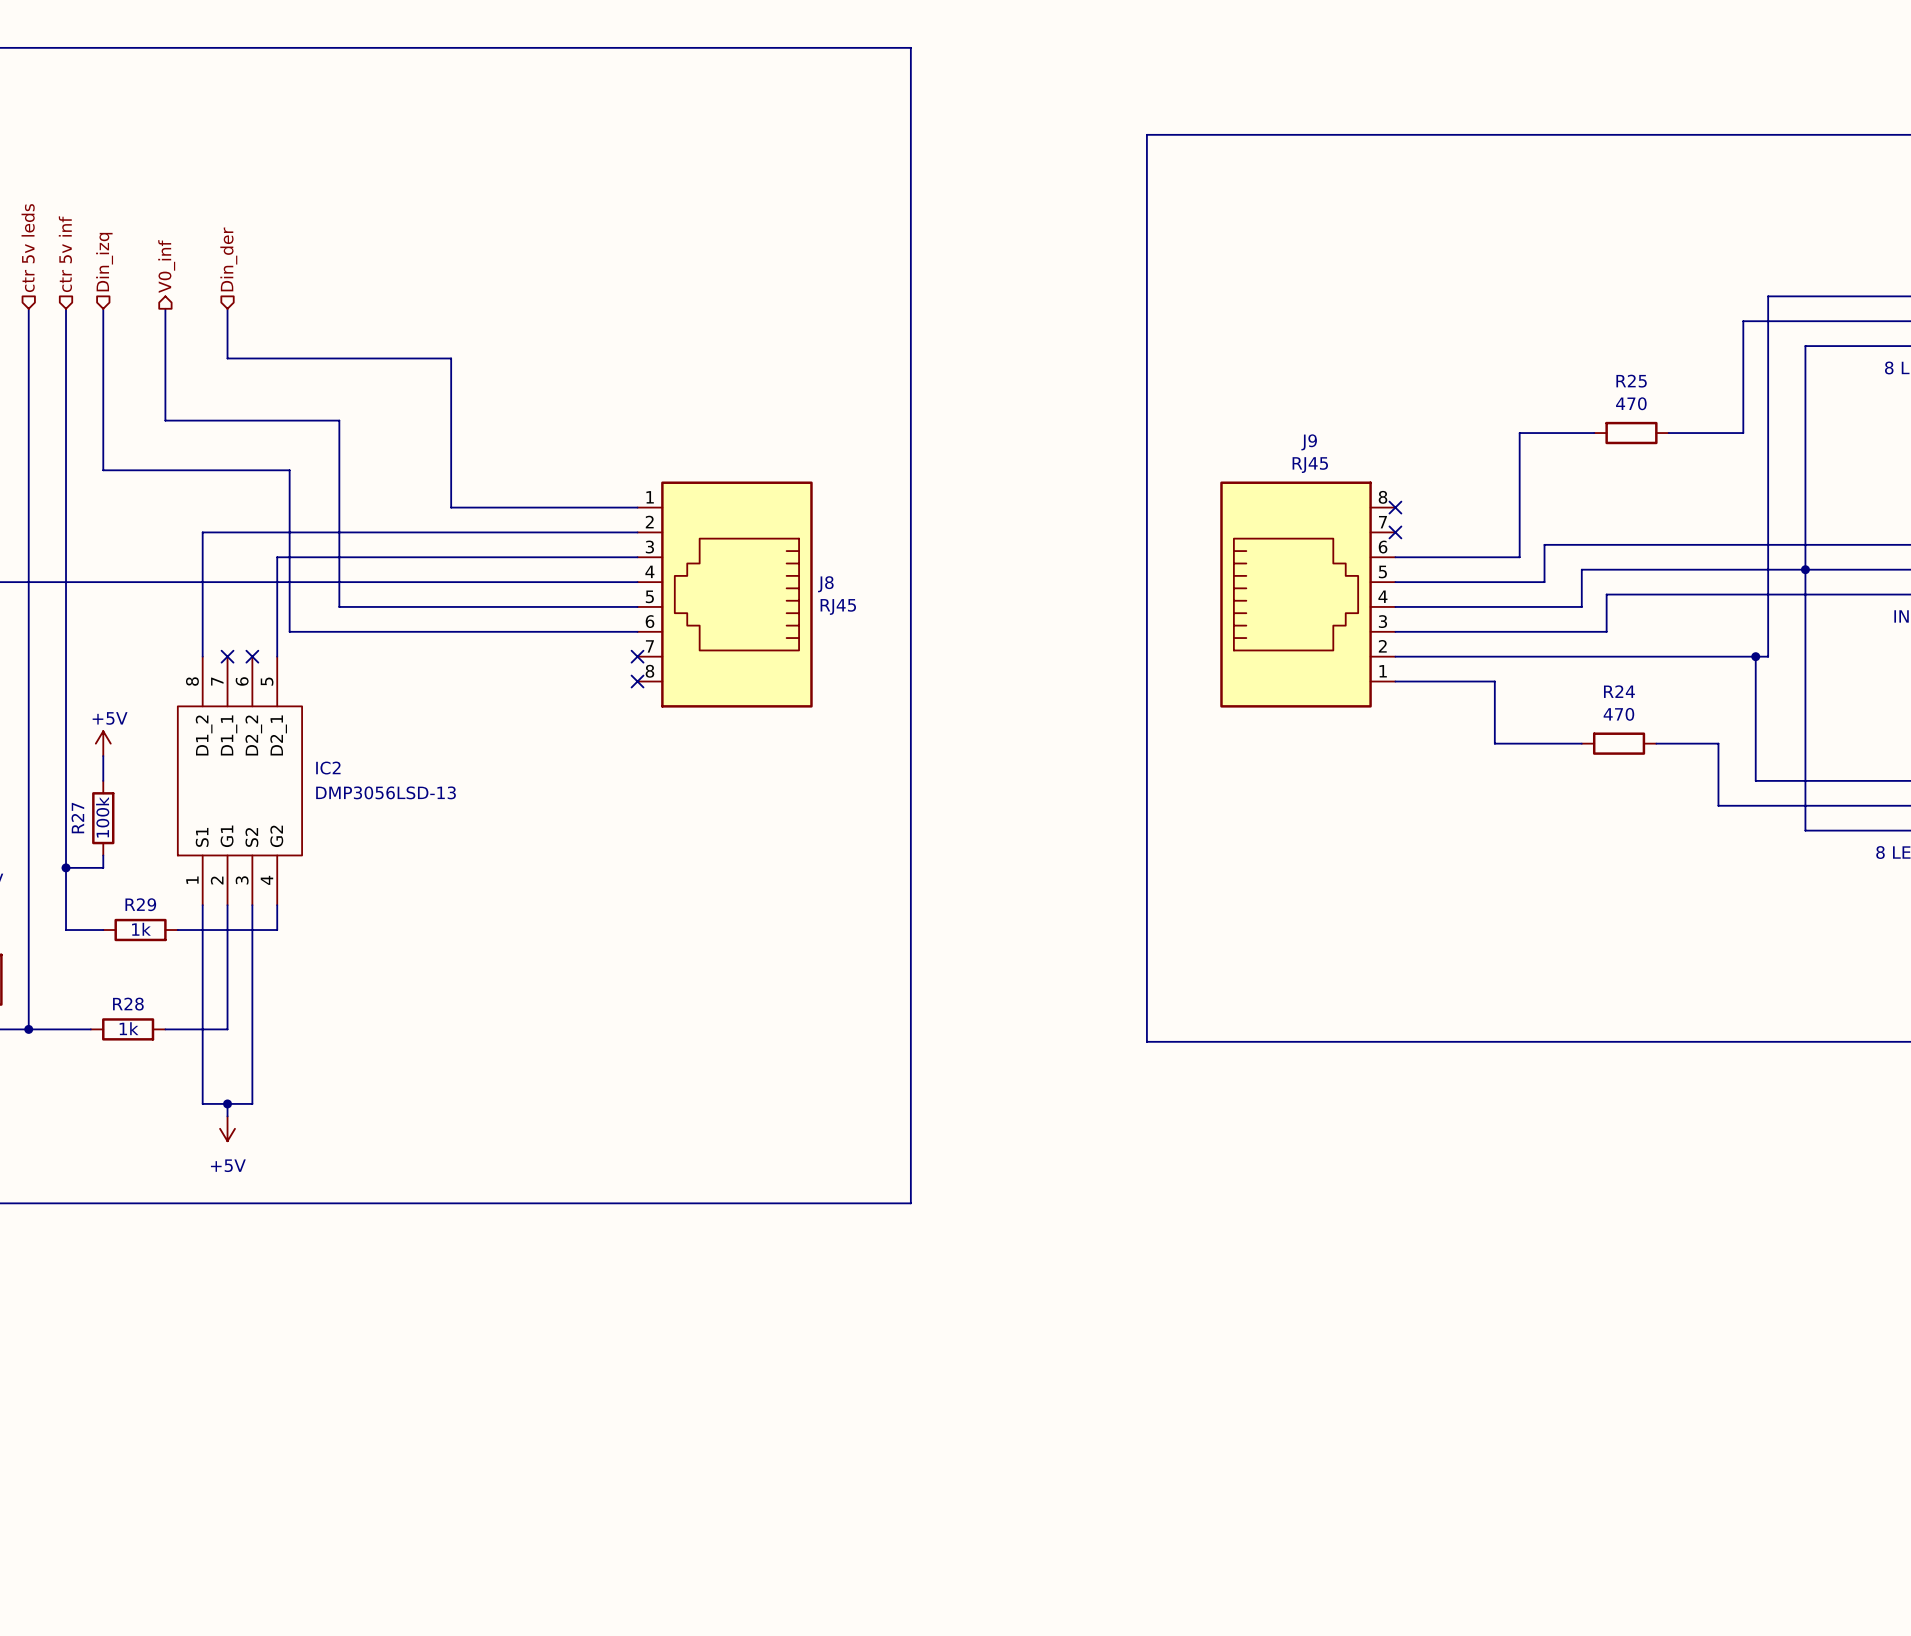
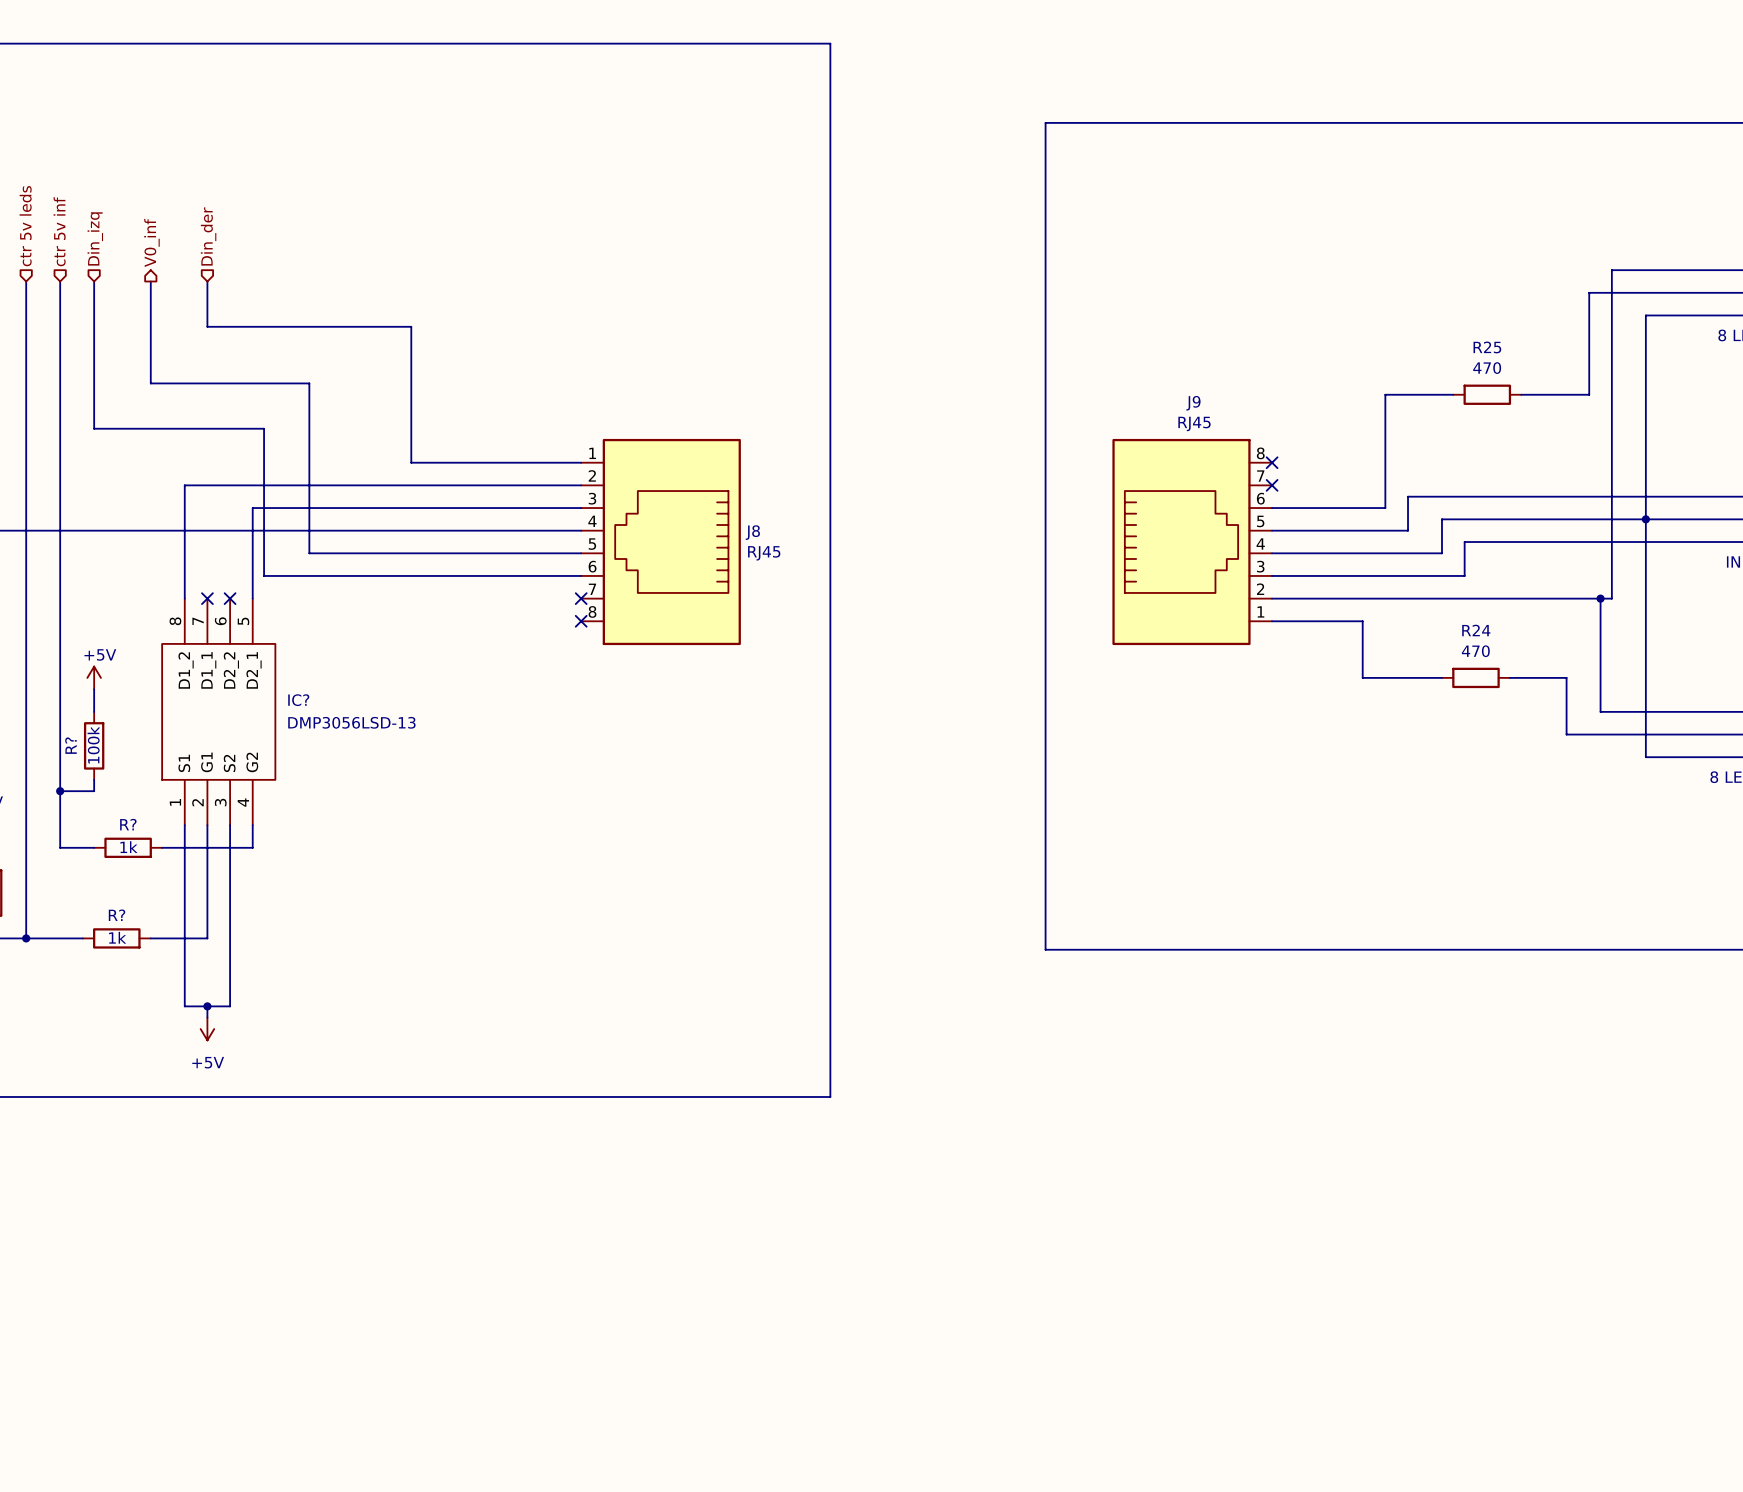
IC2 name: IC2 (328, 768) -> IC? (298, 700)
R27 name: R27 (77, 818) -> R? (70, 745)
R29 name: R29 (140, 904) -> R? (128, 824)
R28 name: R28 (128, 1004) -> R? (117, 915)

